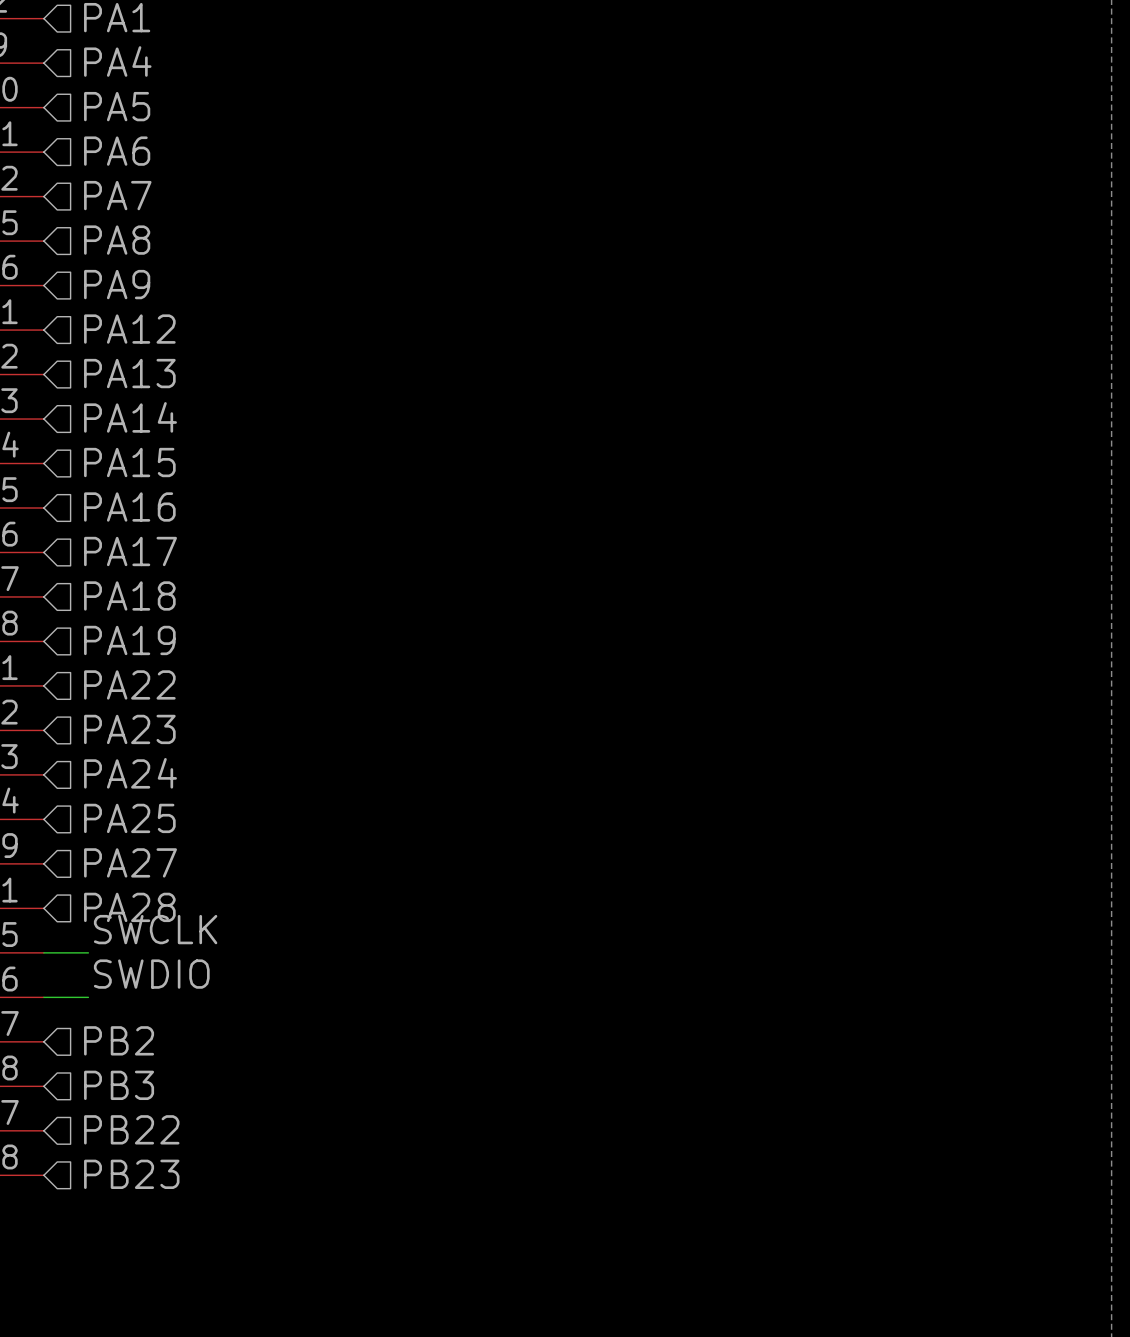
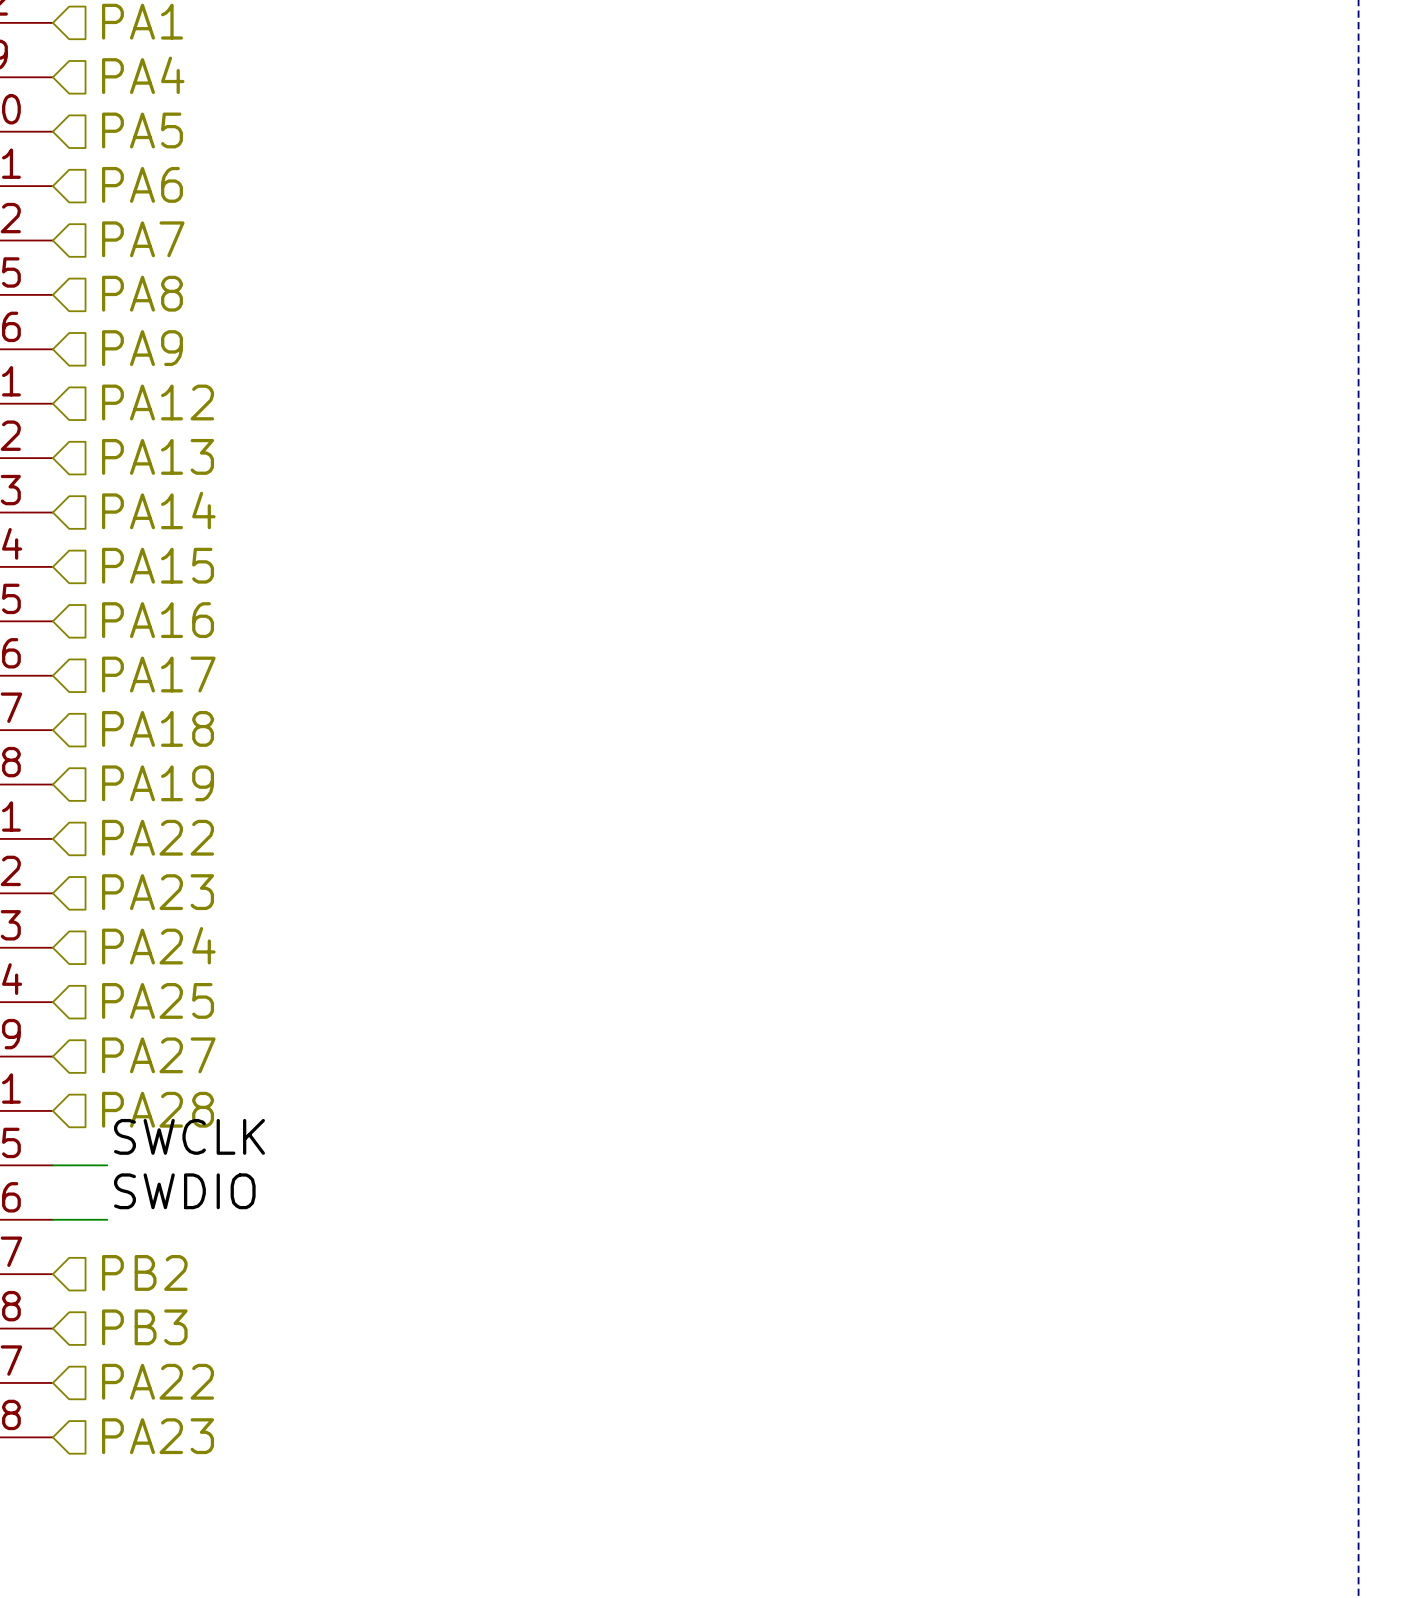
hierarchical label: PB22 (131, 1129) -> PA22 (158, 1381)
hierarchical label: PB23 (131, 1174) -> PA23 (158, 1436)

